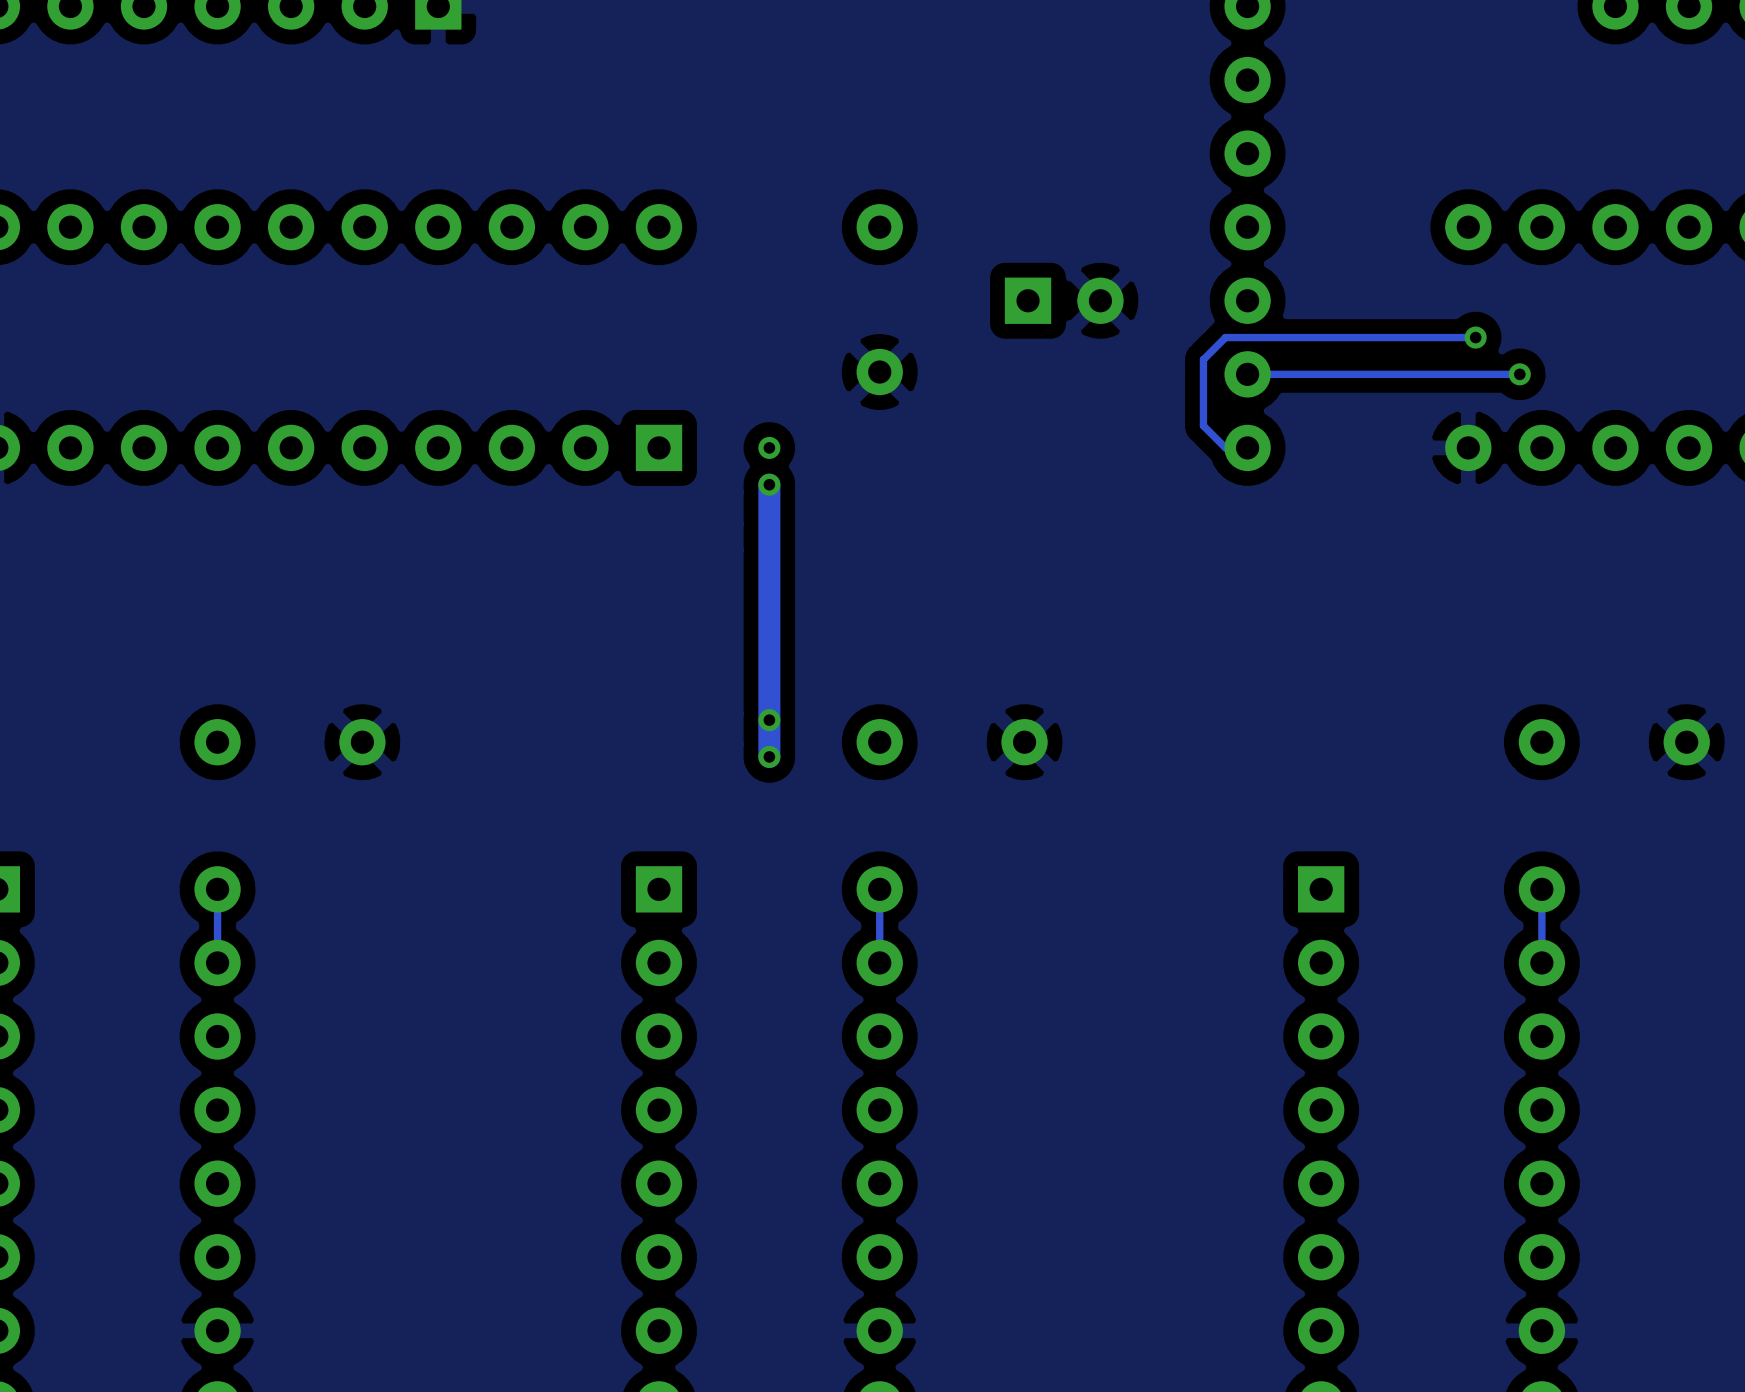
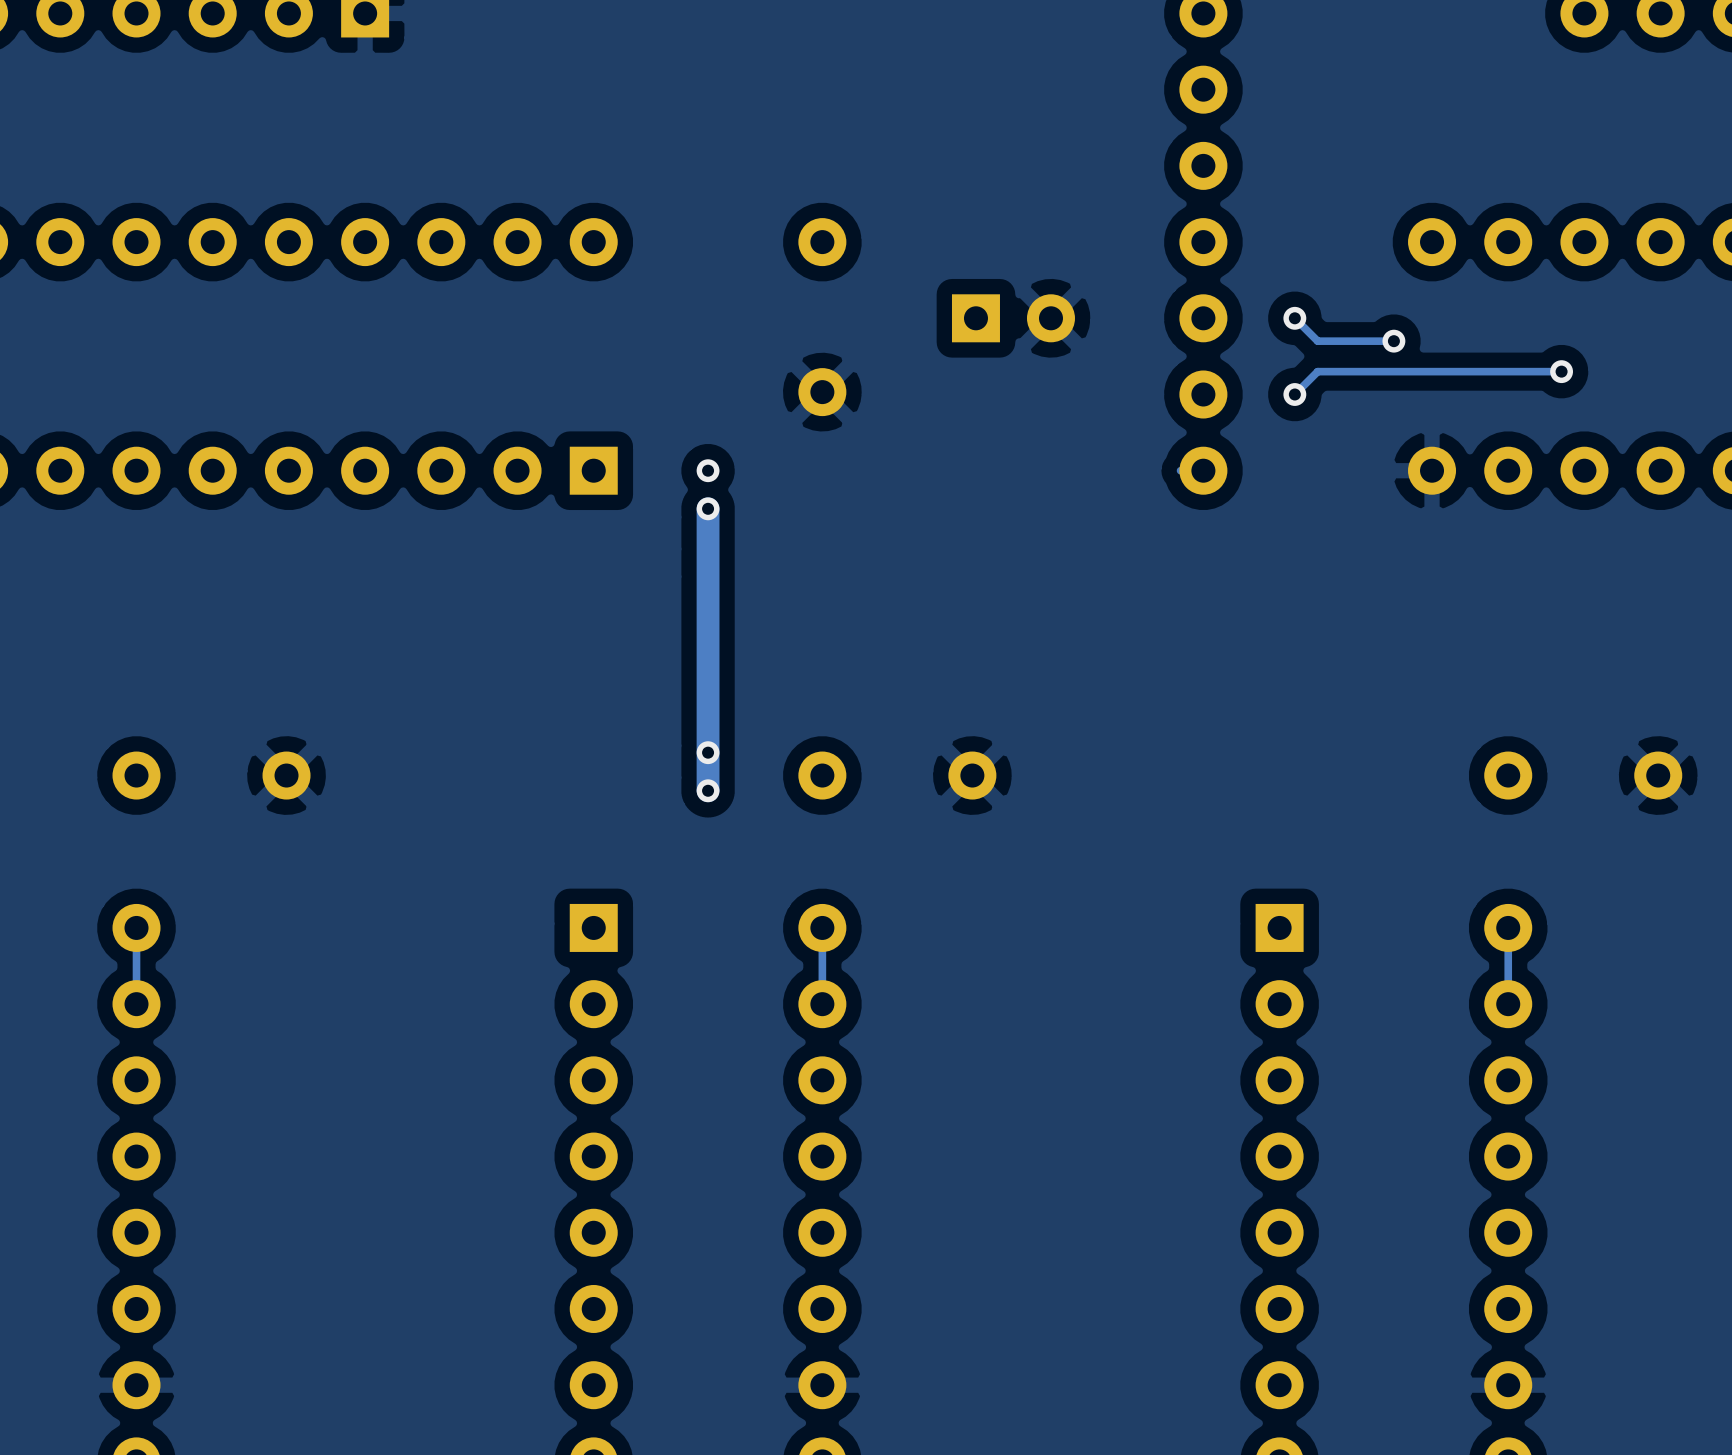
track: none -> (1294, 318) (1317, 341) (1393, 341)
via: none -> (1294, 318)
track: (1475, 337) (1225, 337) (1203, 359) (1203, 425) (1225, 447) -> none
via position: (1475, 337) -> (1393, 341)
track: none -> (1561, 371) (1317, 371) (1294, 394)
via: none -> (1561, 371)
via: none -> (1294, 394)
track: (1519, 374) (1247, 374) -> none
via: (1519, 374) -> none

